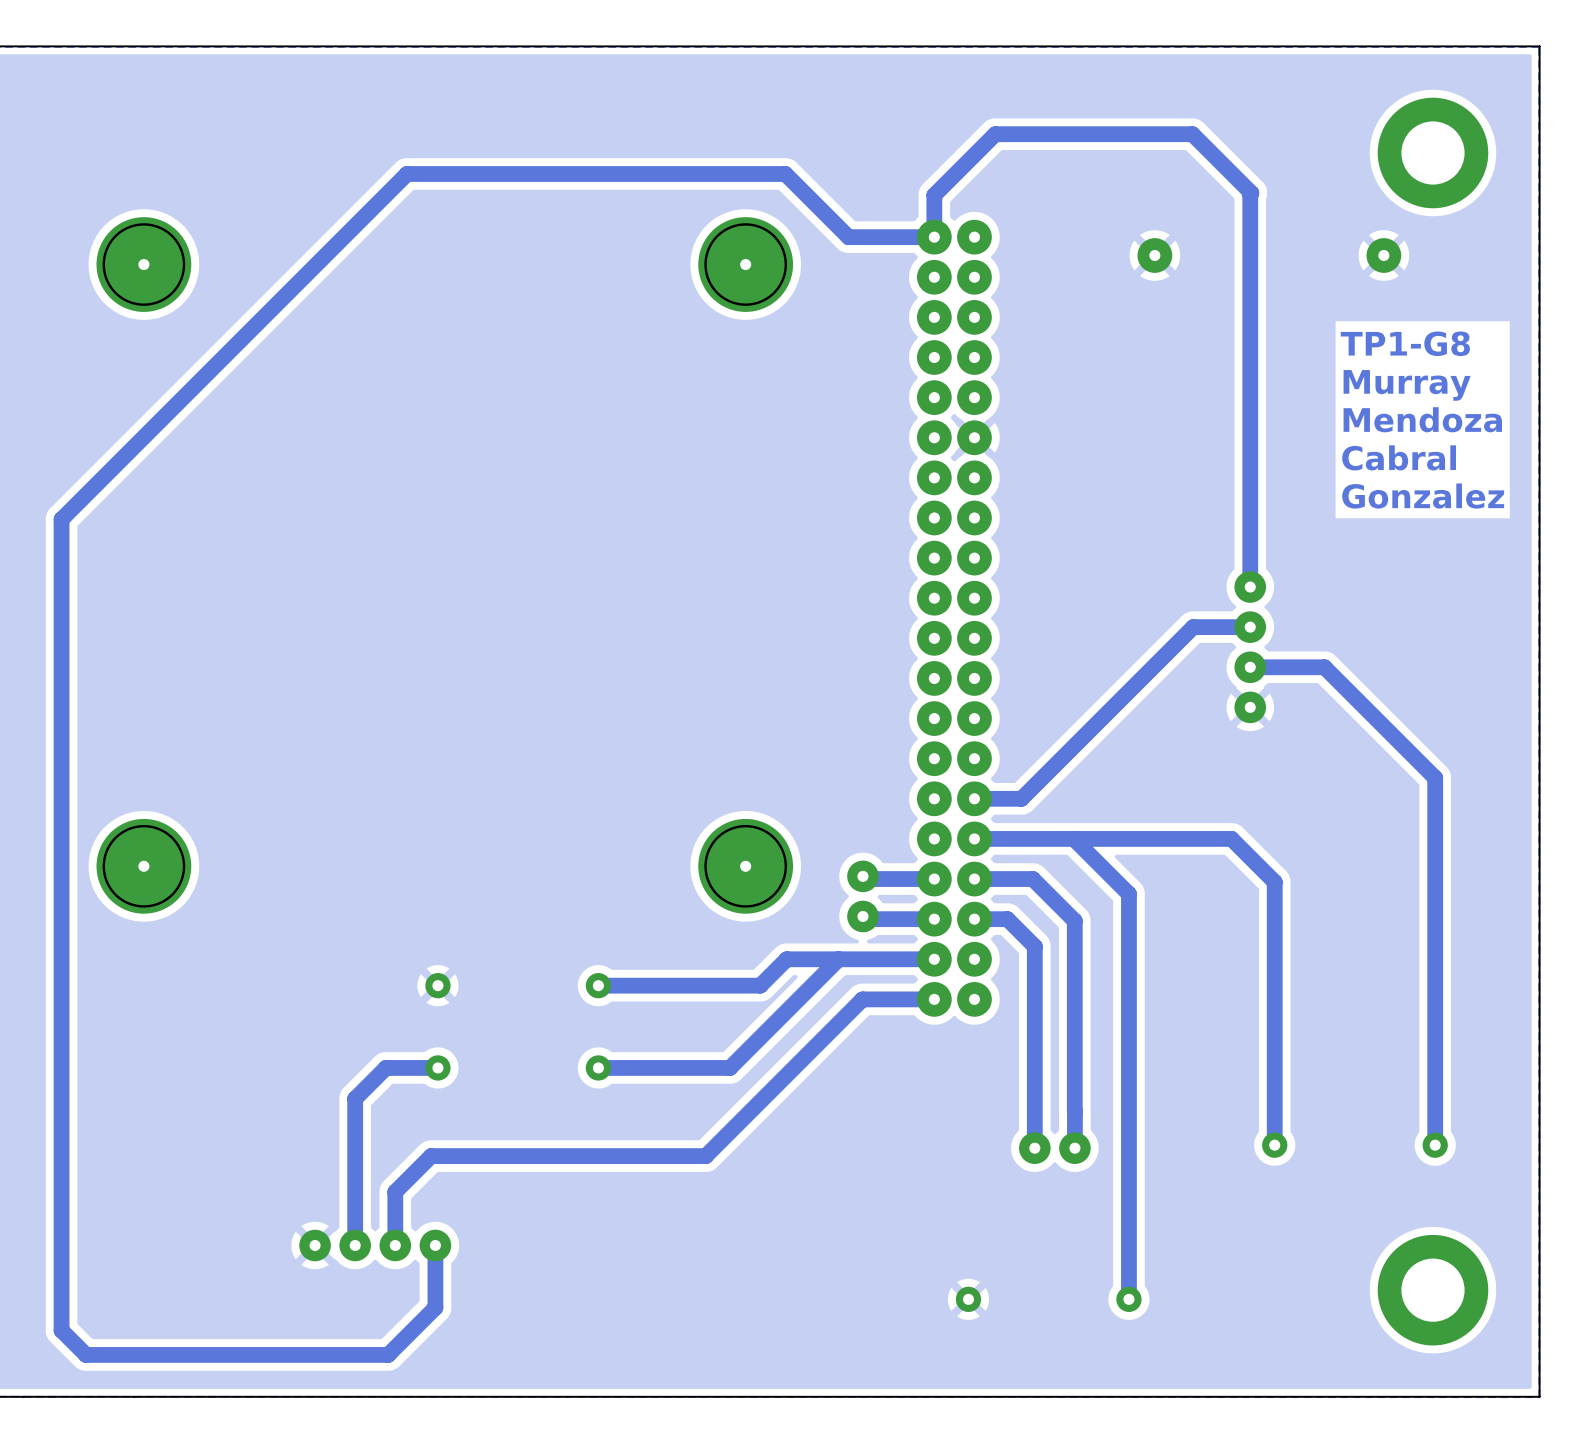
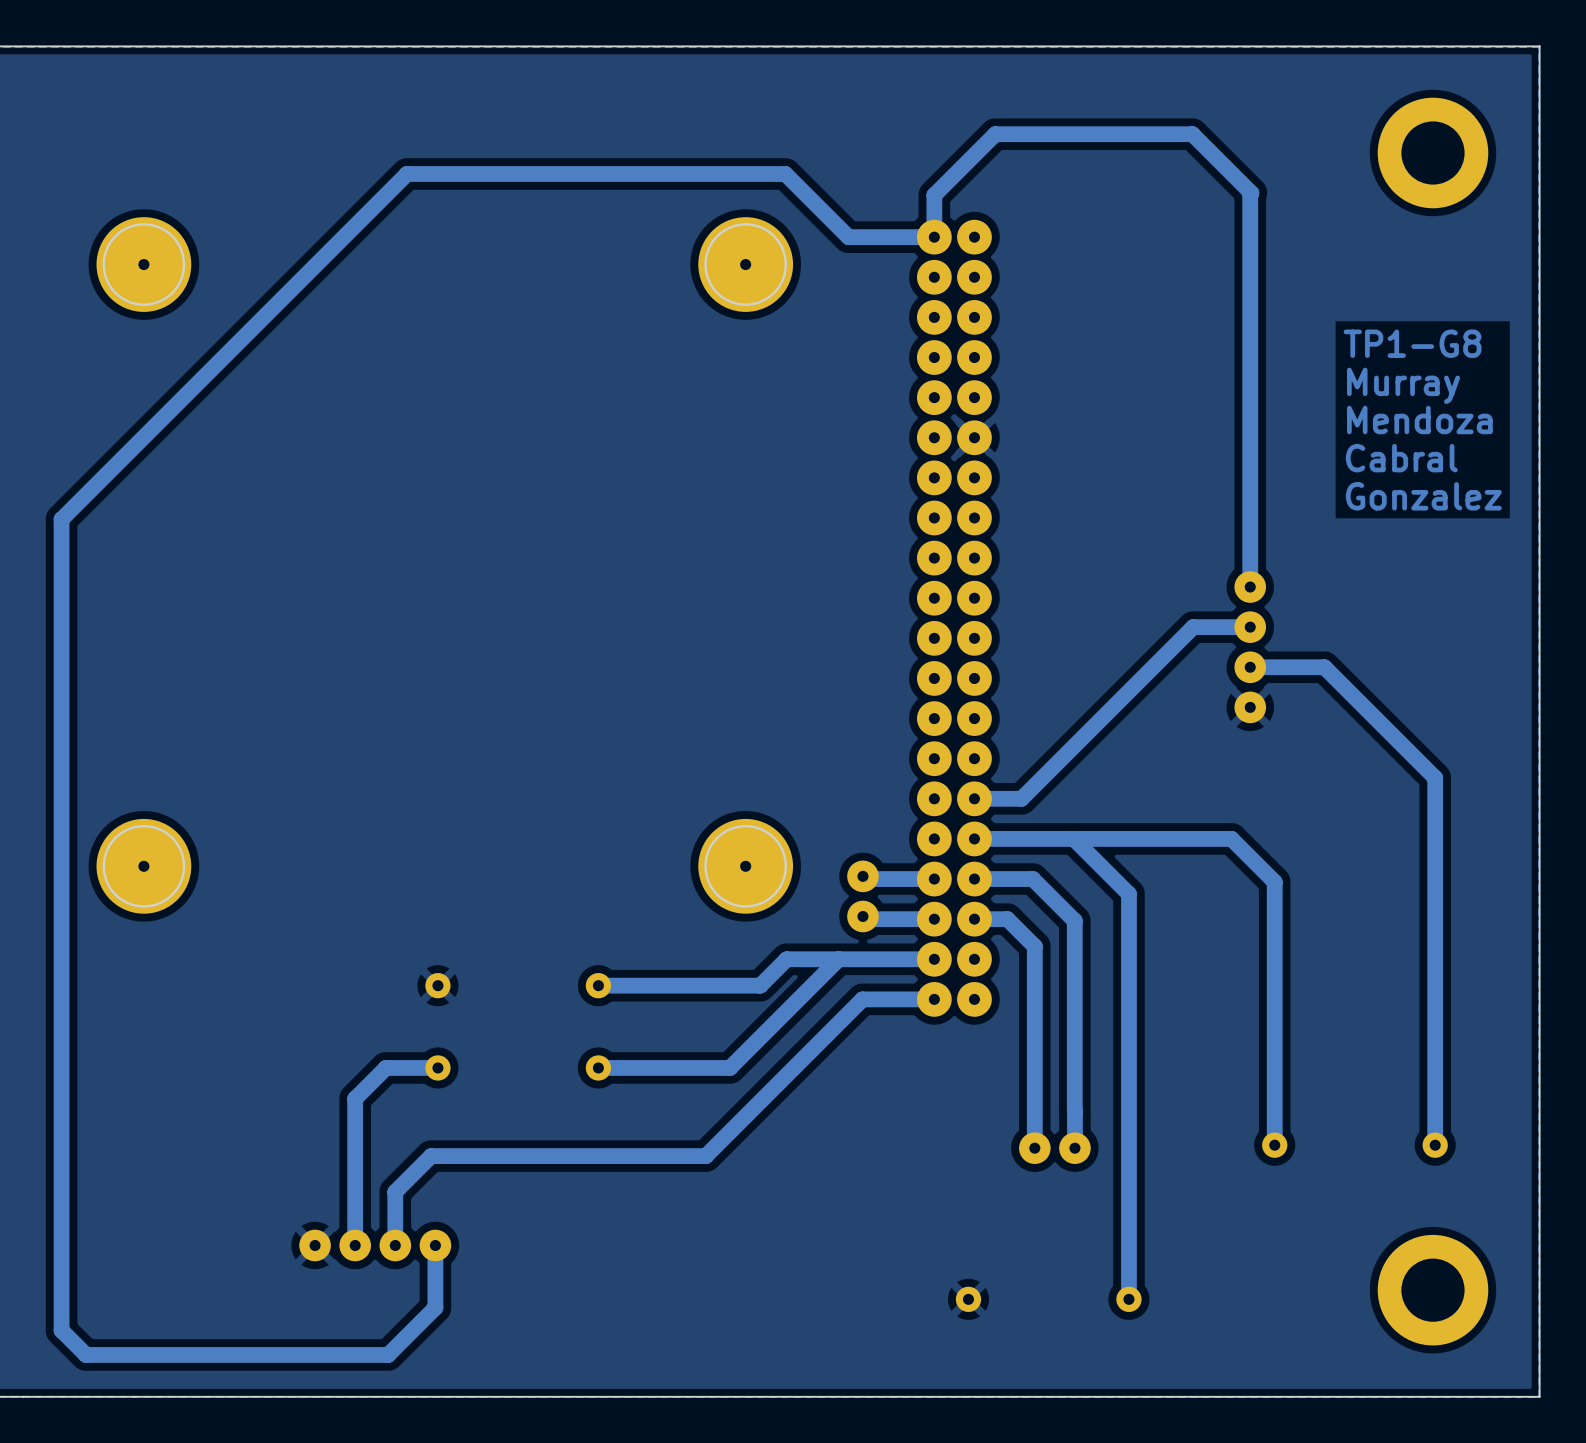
part: (1154, 255) -> none
part: (1383, 255) -> none

